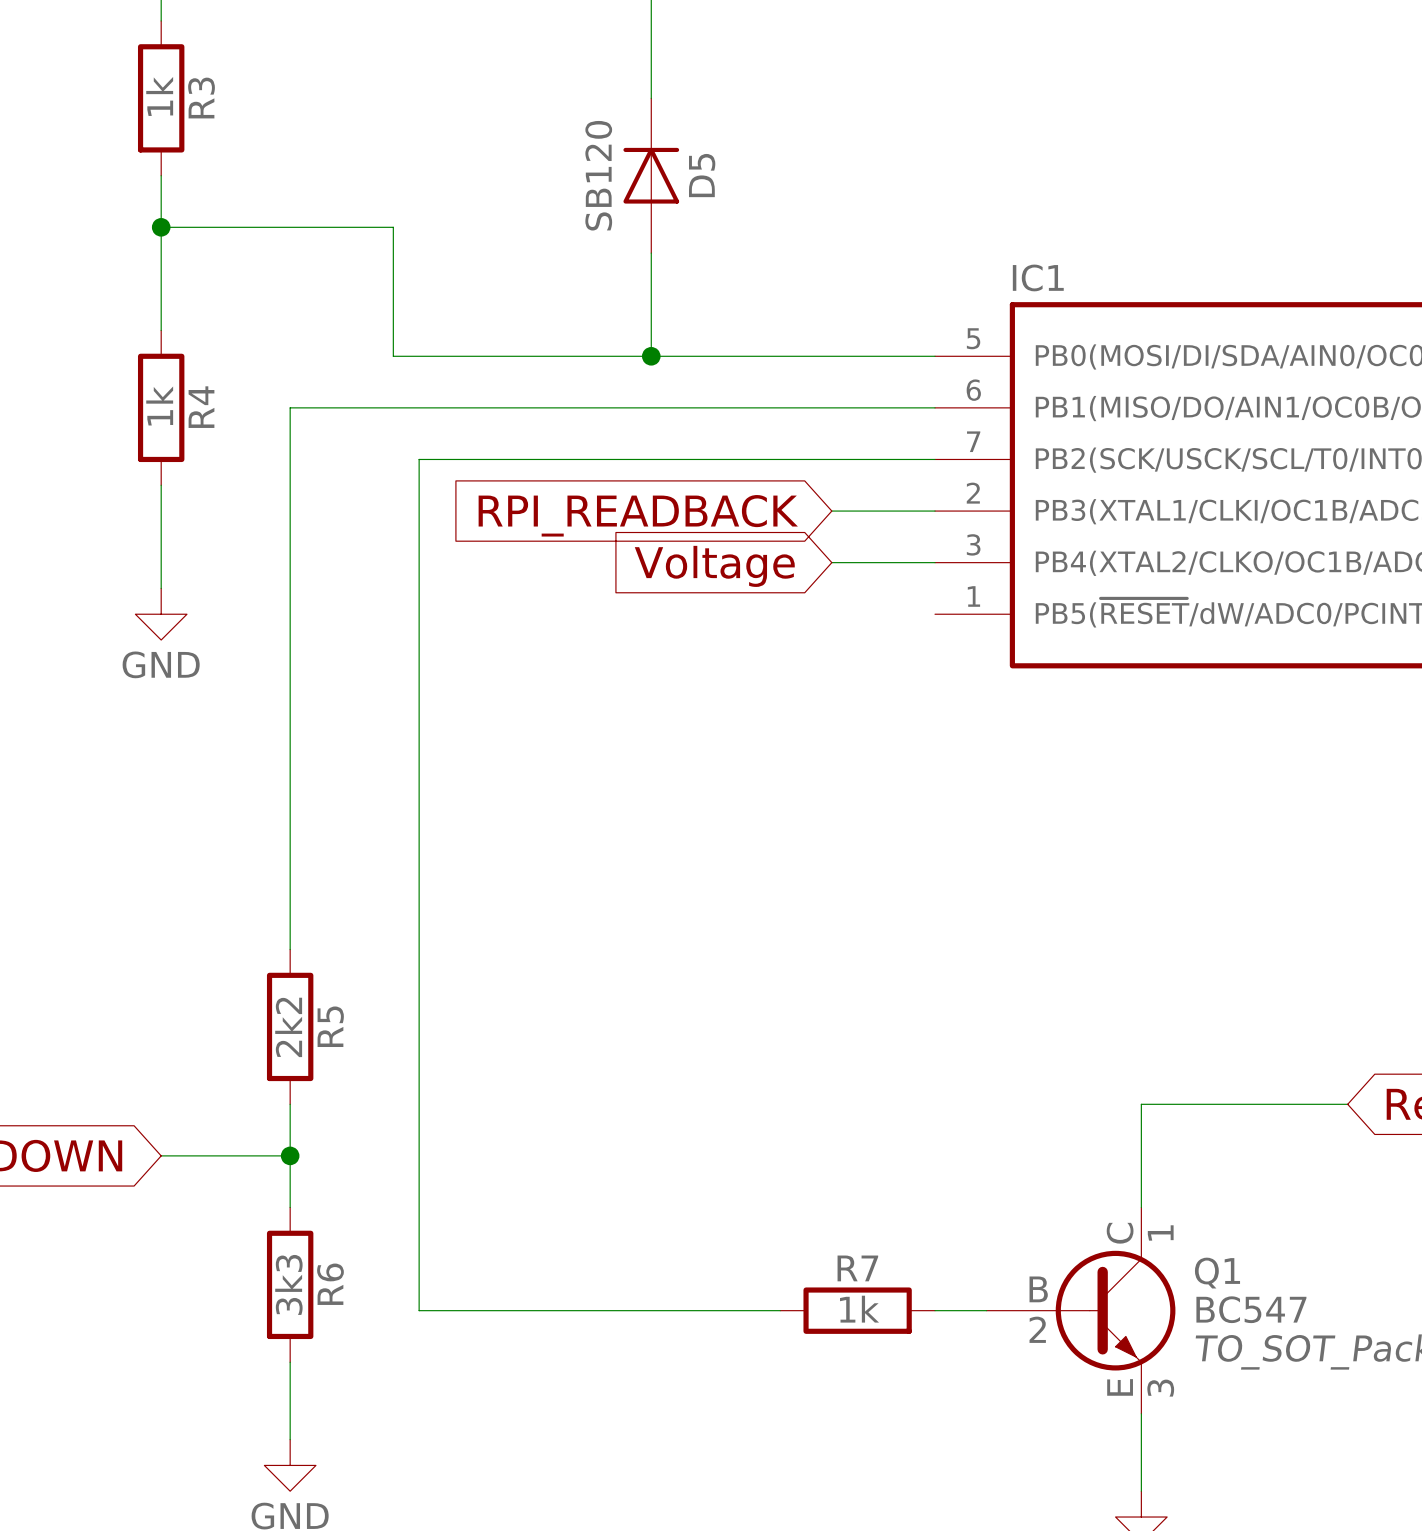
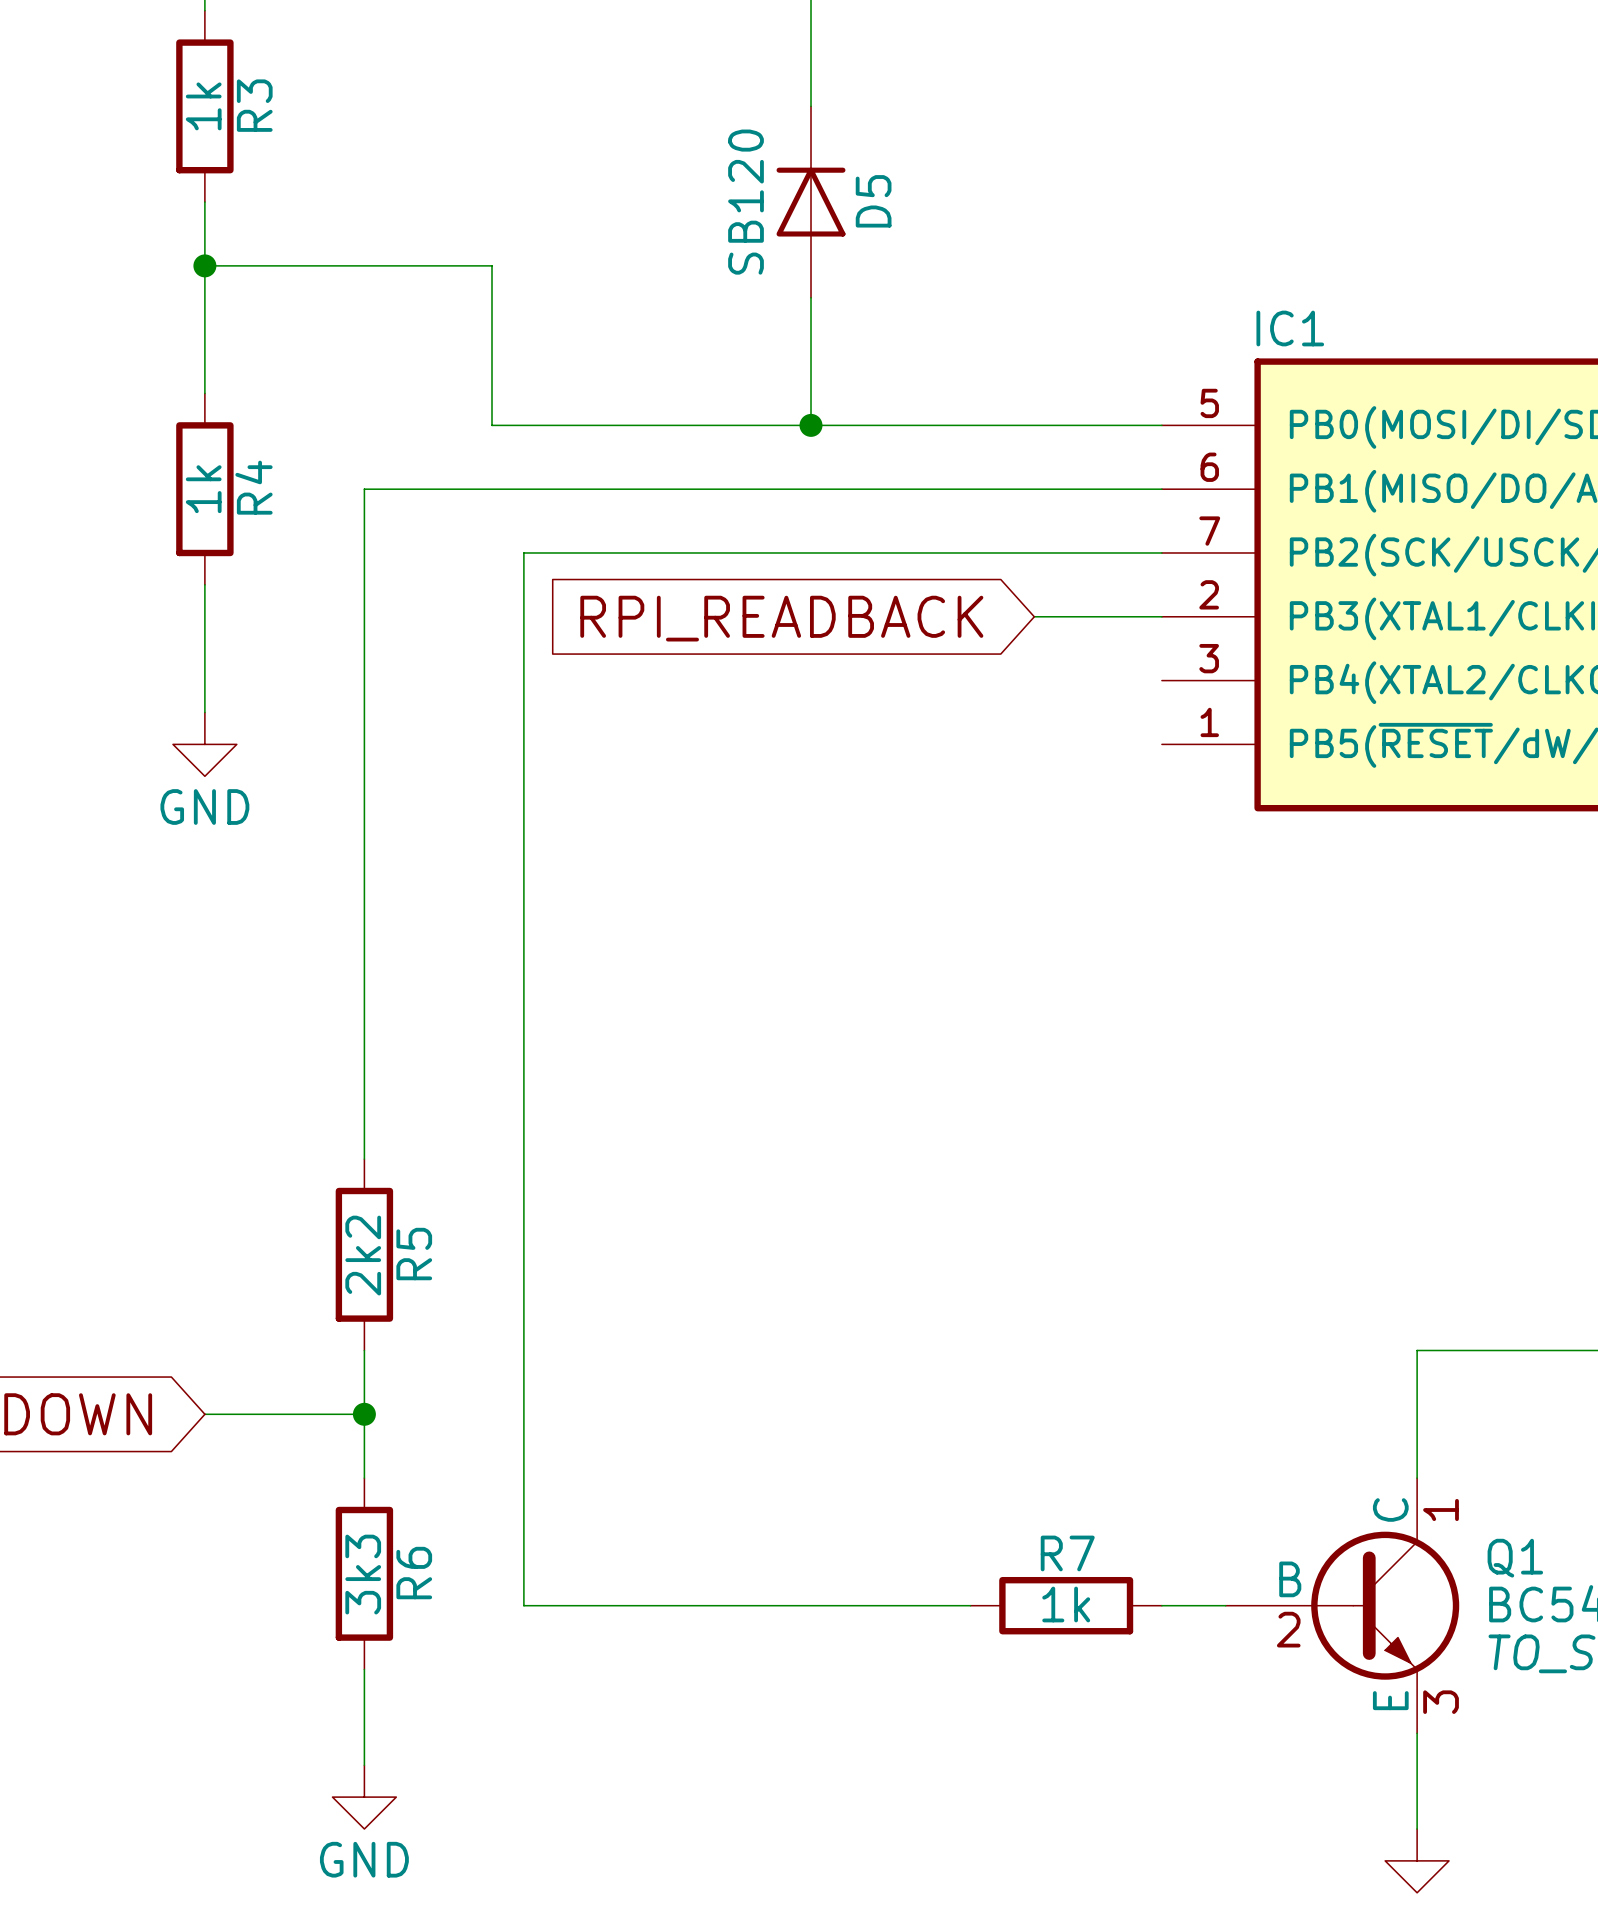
wire: (831, 562) (935, 562) -> none
global label: Voltage (714, 566) -> none

